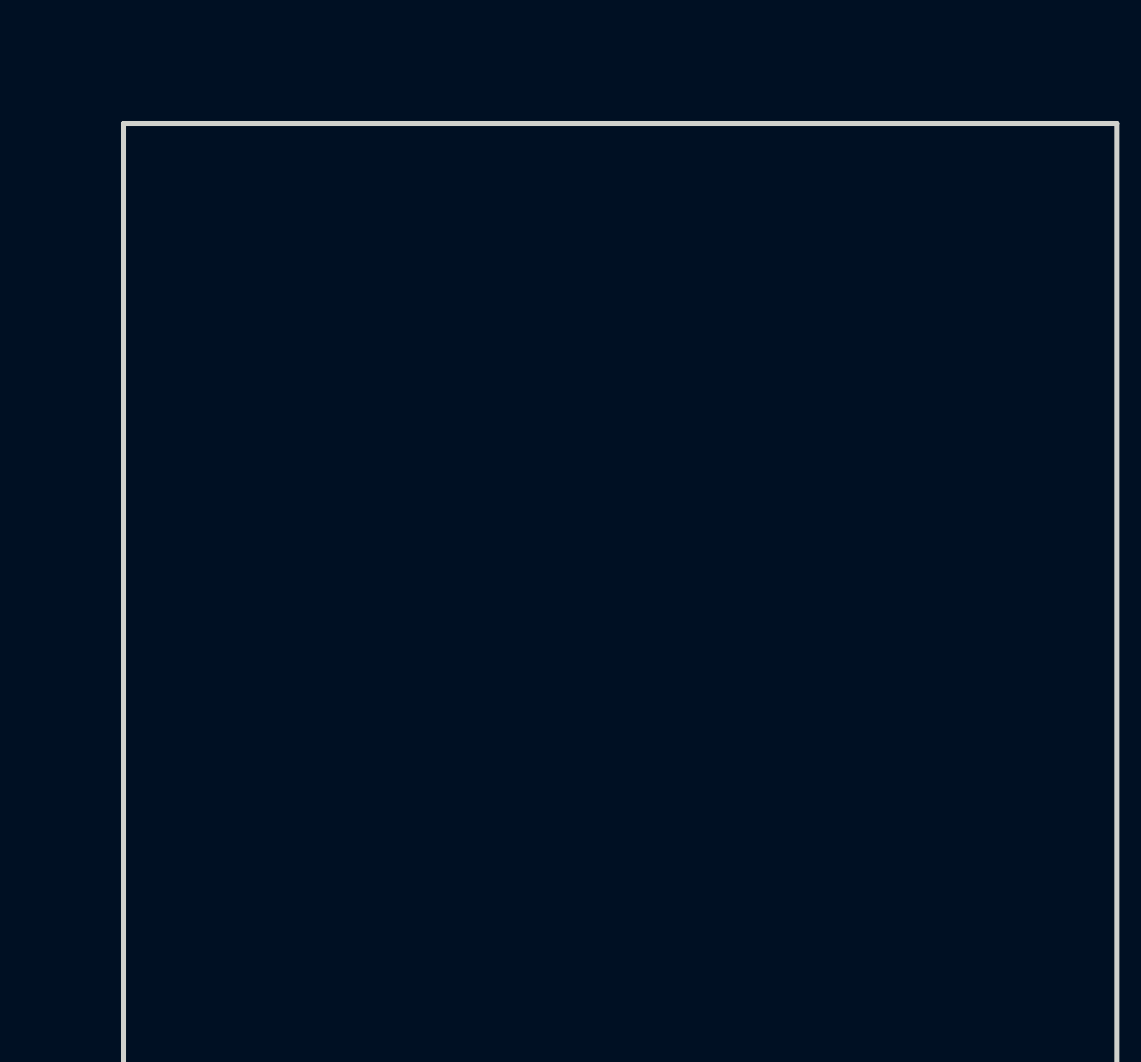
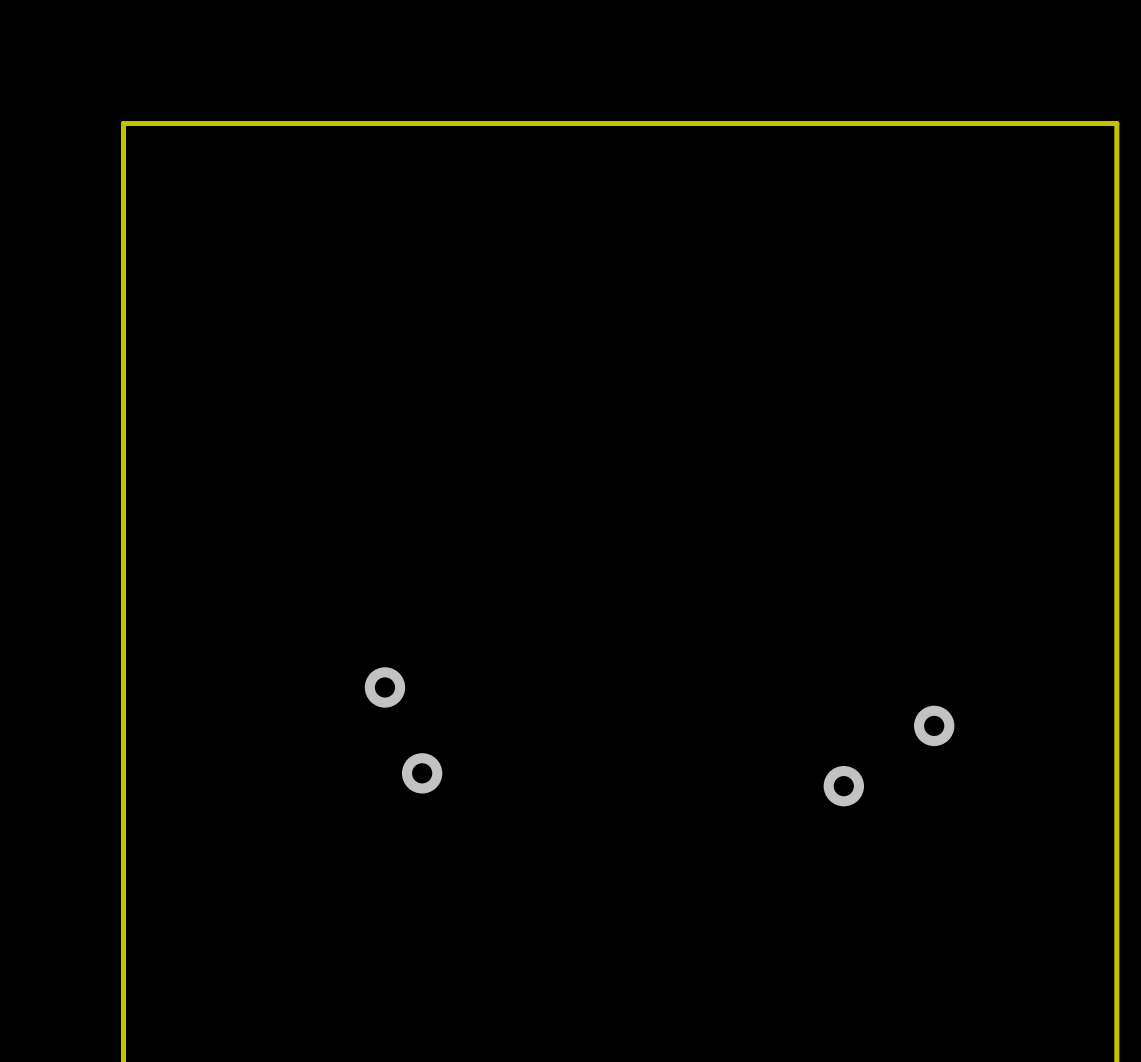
via: none -> (384, 687)
via: none -> (934, 725)
via: none -> (422, 773)
via: none -> (843, 786)

